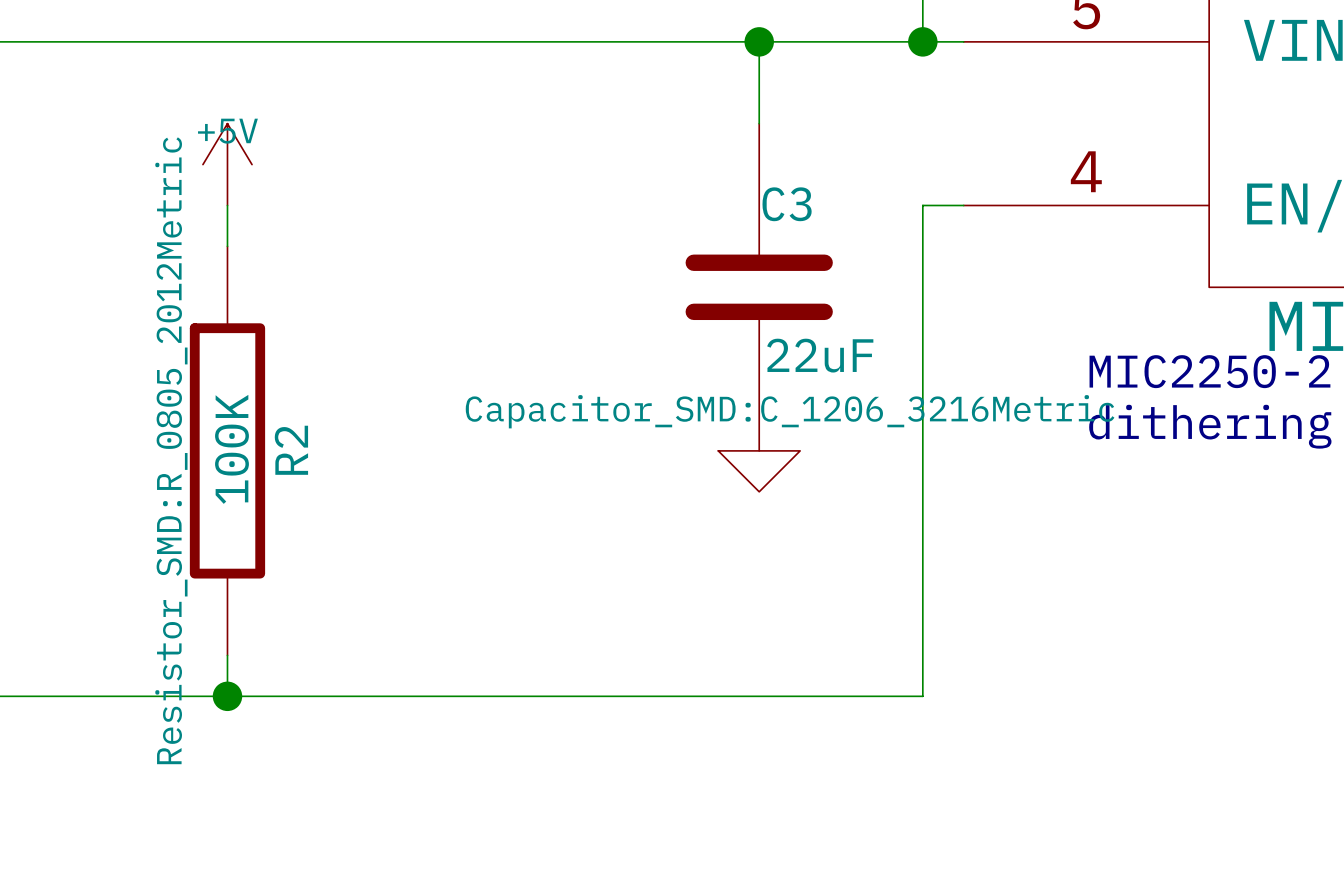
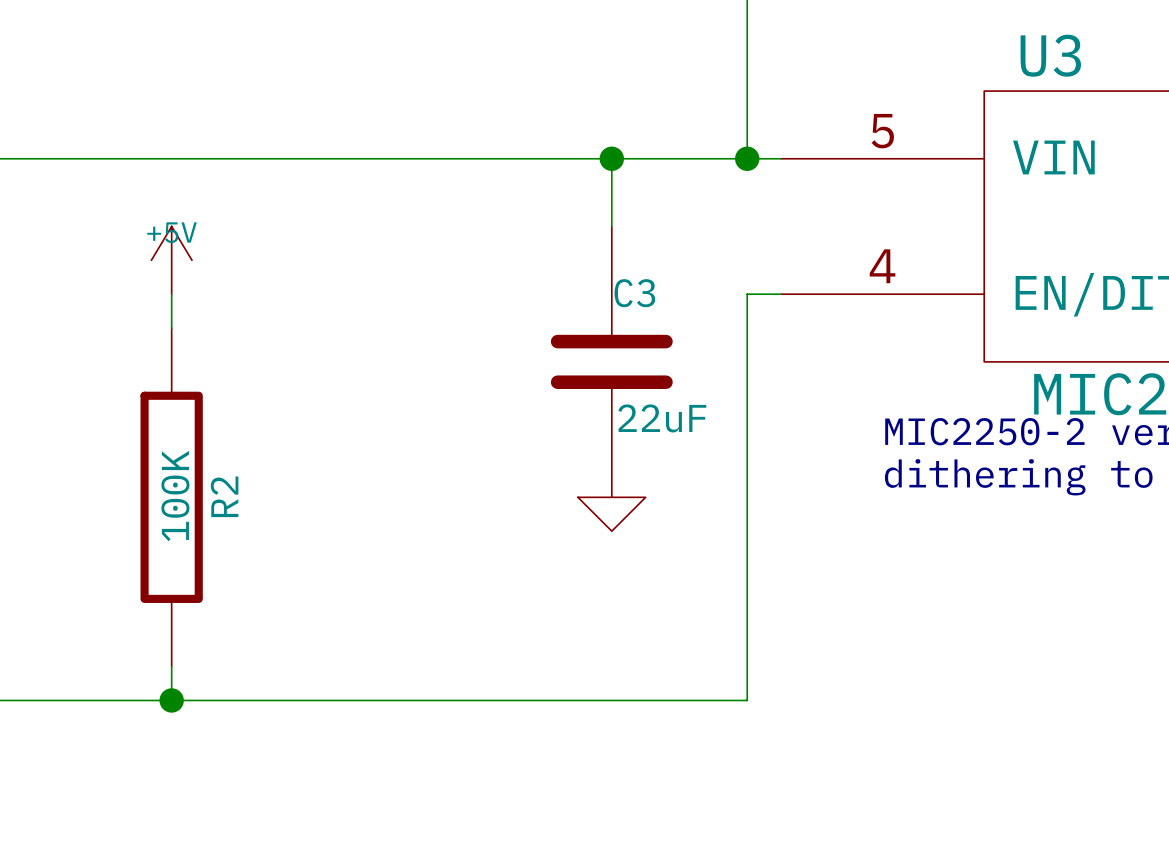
C3 text: Capacitor_SMD:C_1206_3216Metric (790, 411) -> none
R2 text: Resistor_SMD:R_0805_2012Metric (171, 450) -> none

